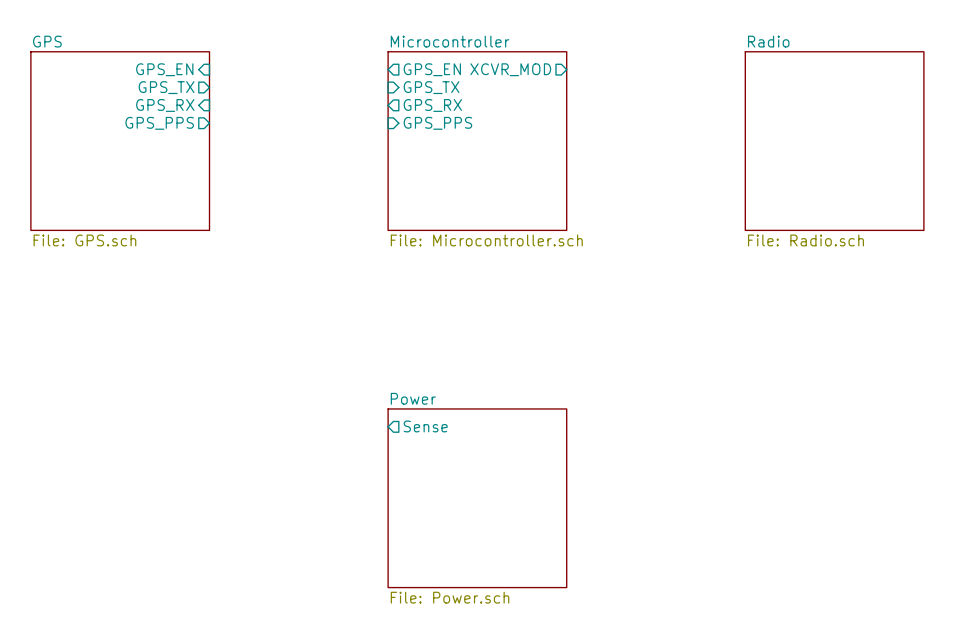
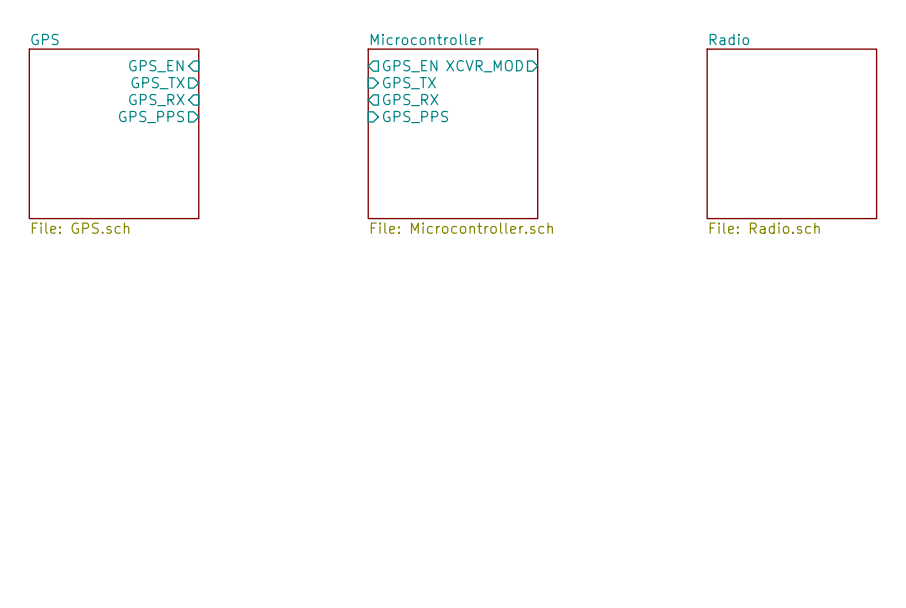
sheet pin: Sense (425, 426) -> none
sheet Power: File: Power.sch (477, 498) -> none

